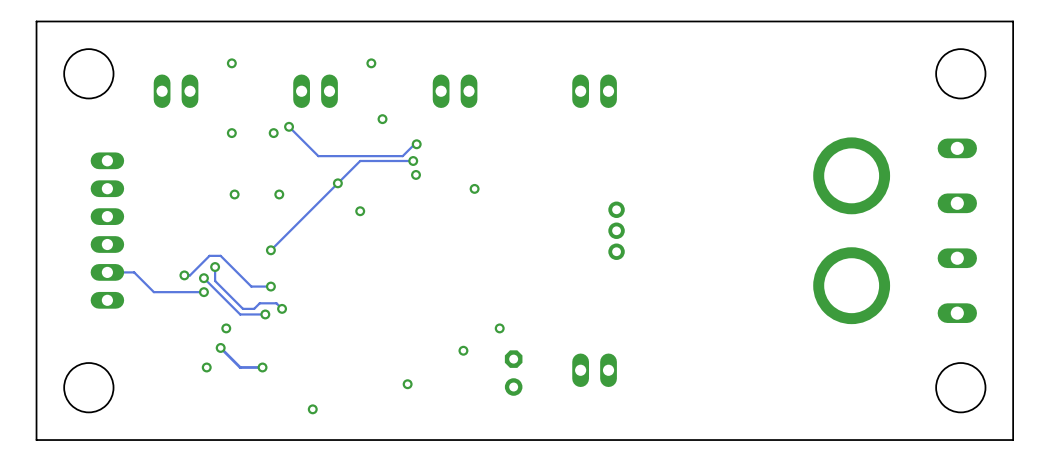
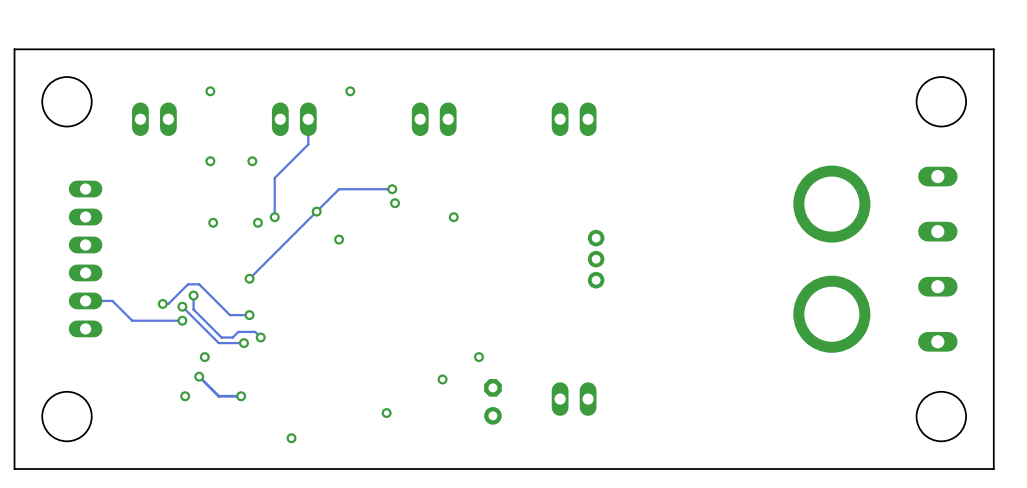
track: none -> (308, 119) (308, 144) (274, 178) (274, 217)
via: (382, 119) -> none
track: (289, 126) (318, 156) (402, 156) (416, 144) -> none
via: (289, 126) -> none
via: (416, 144) -> none
via: none -> (274, 217)

